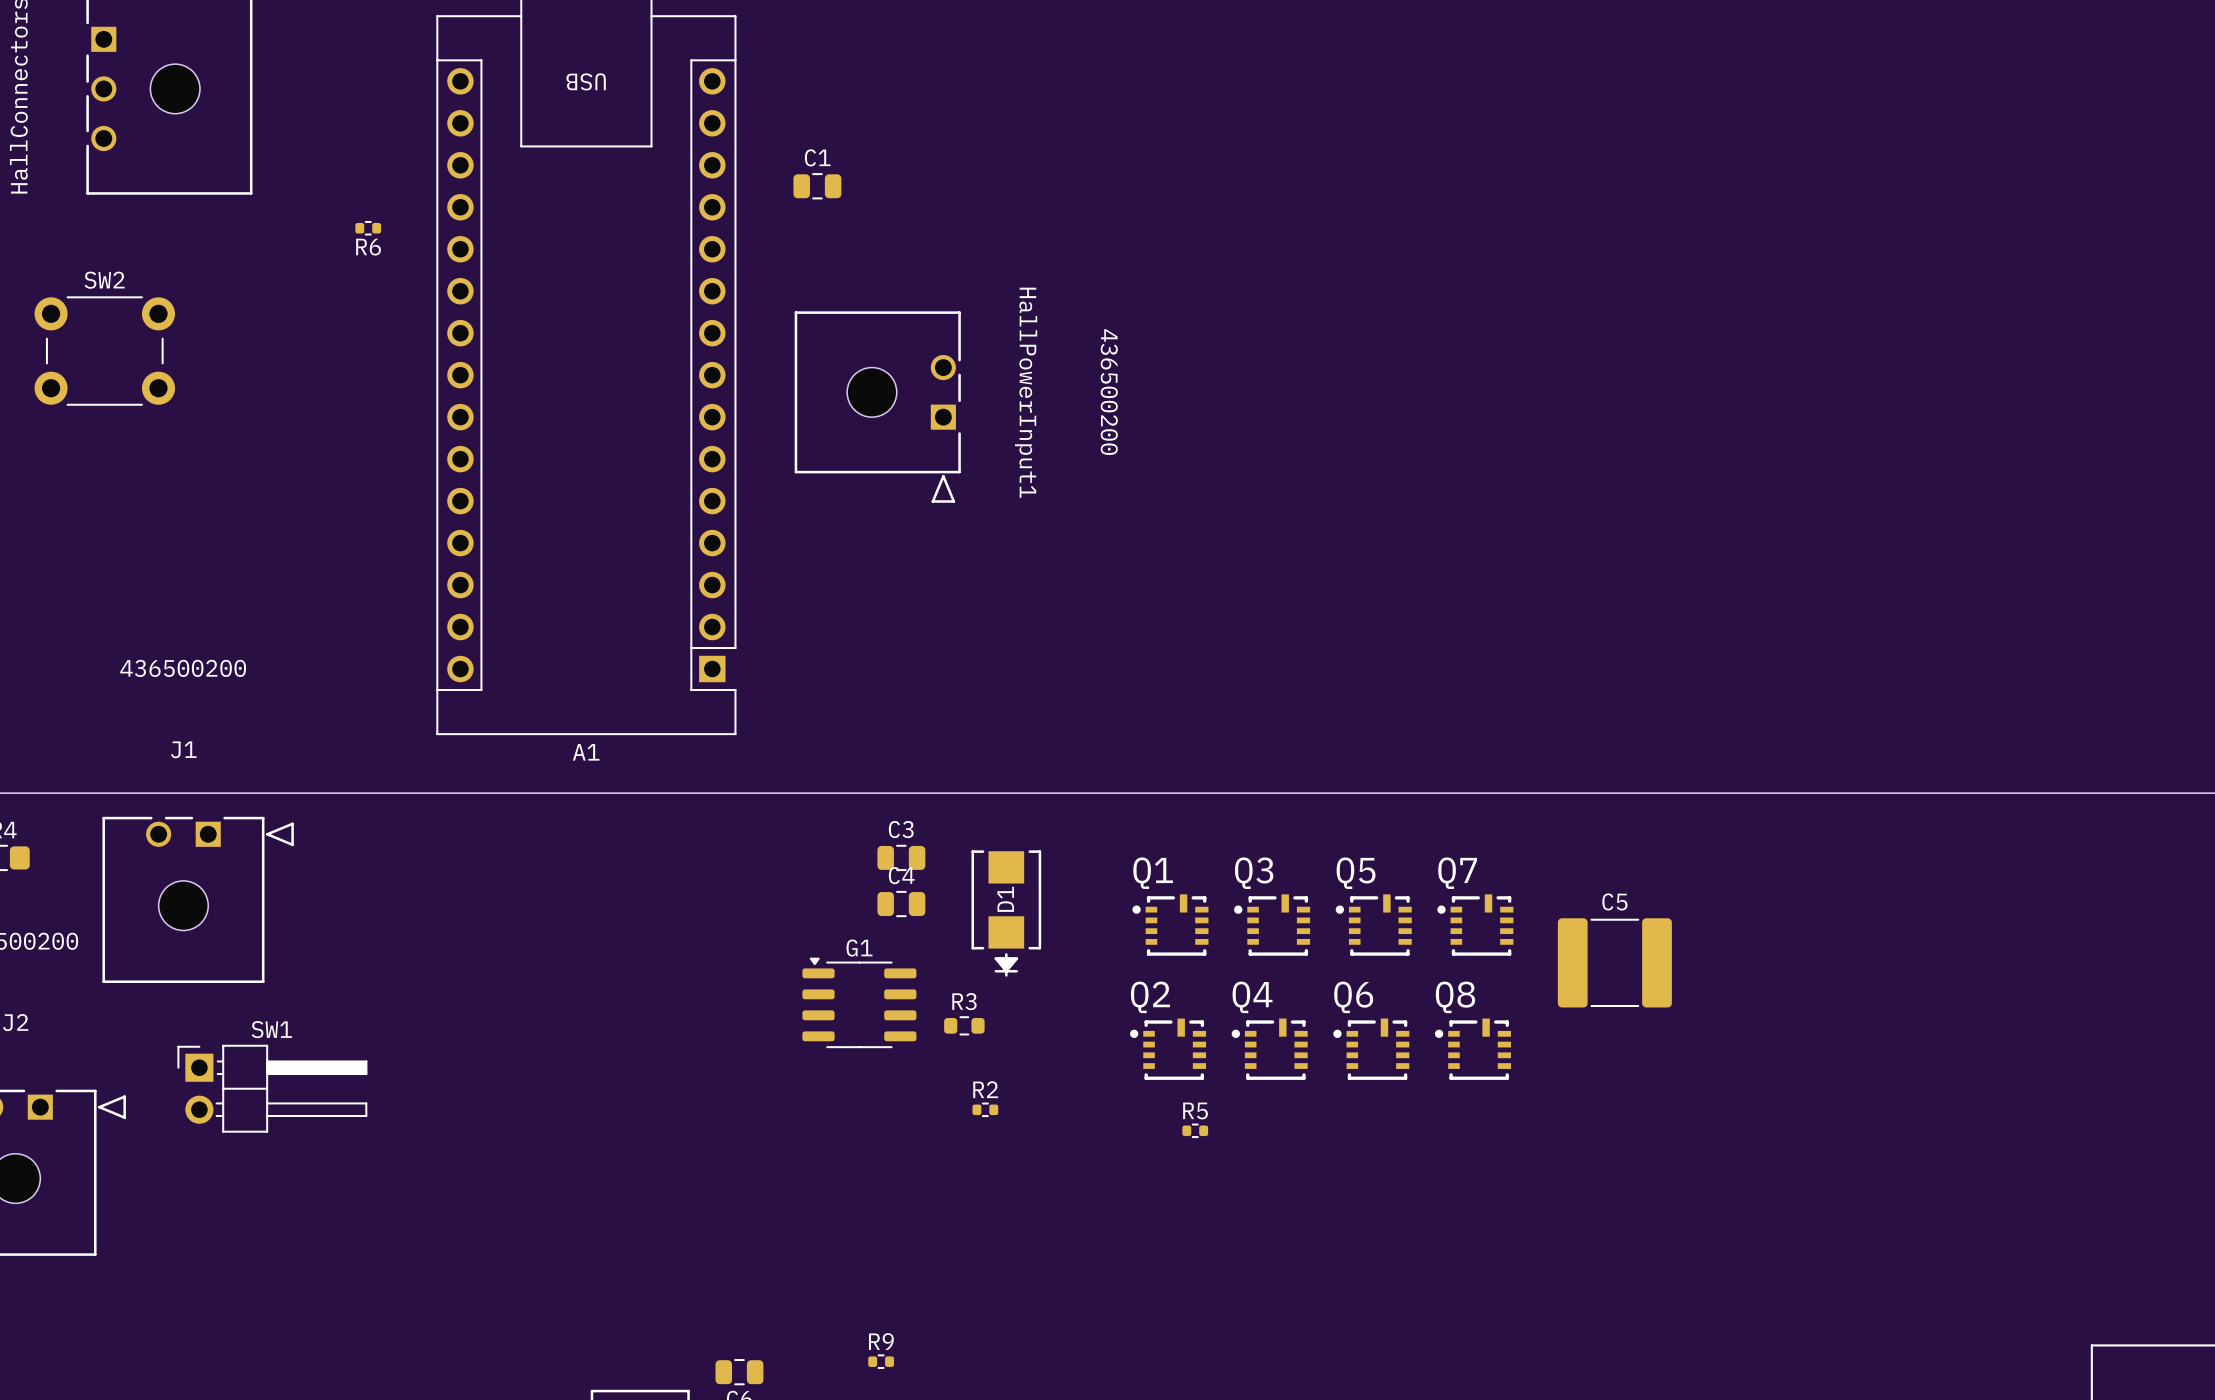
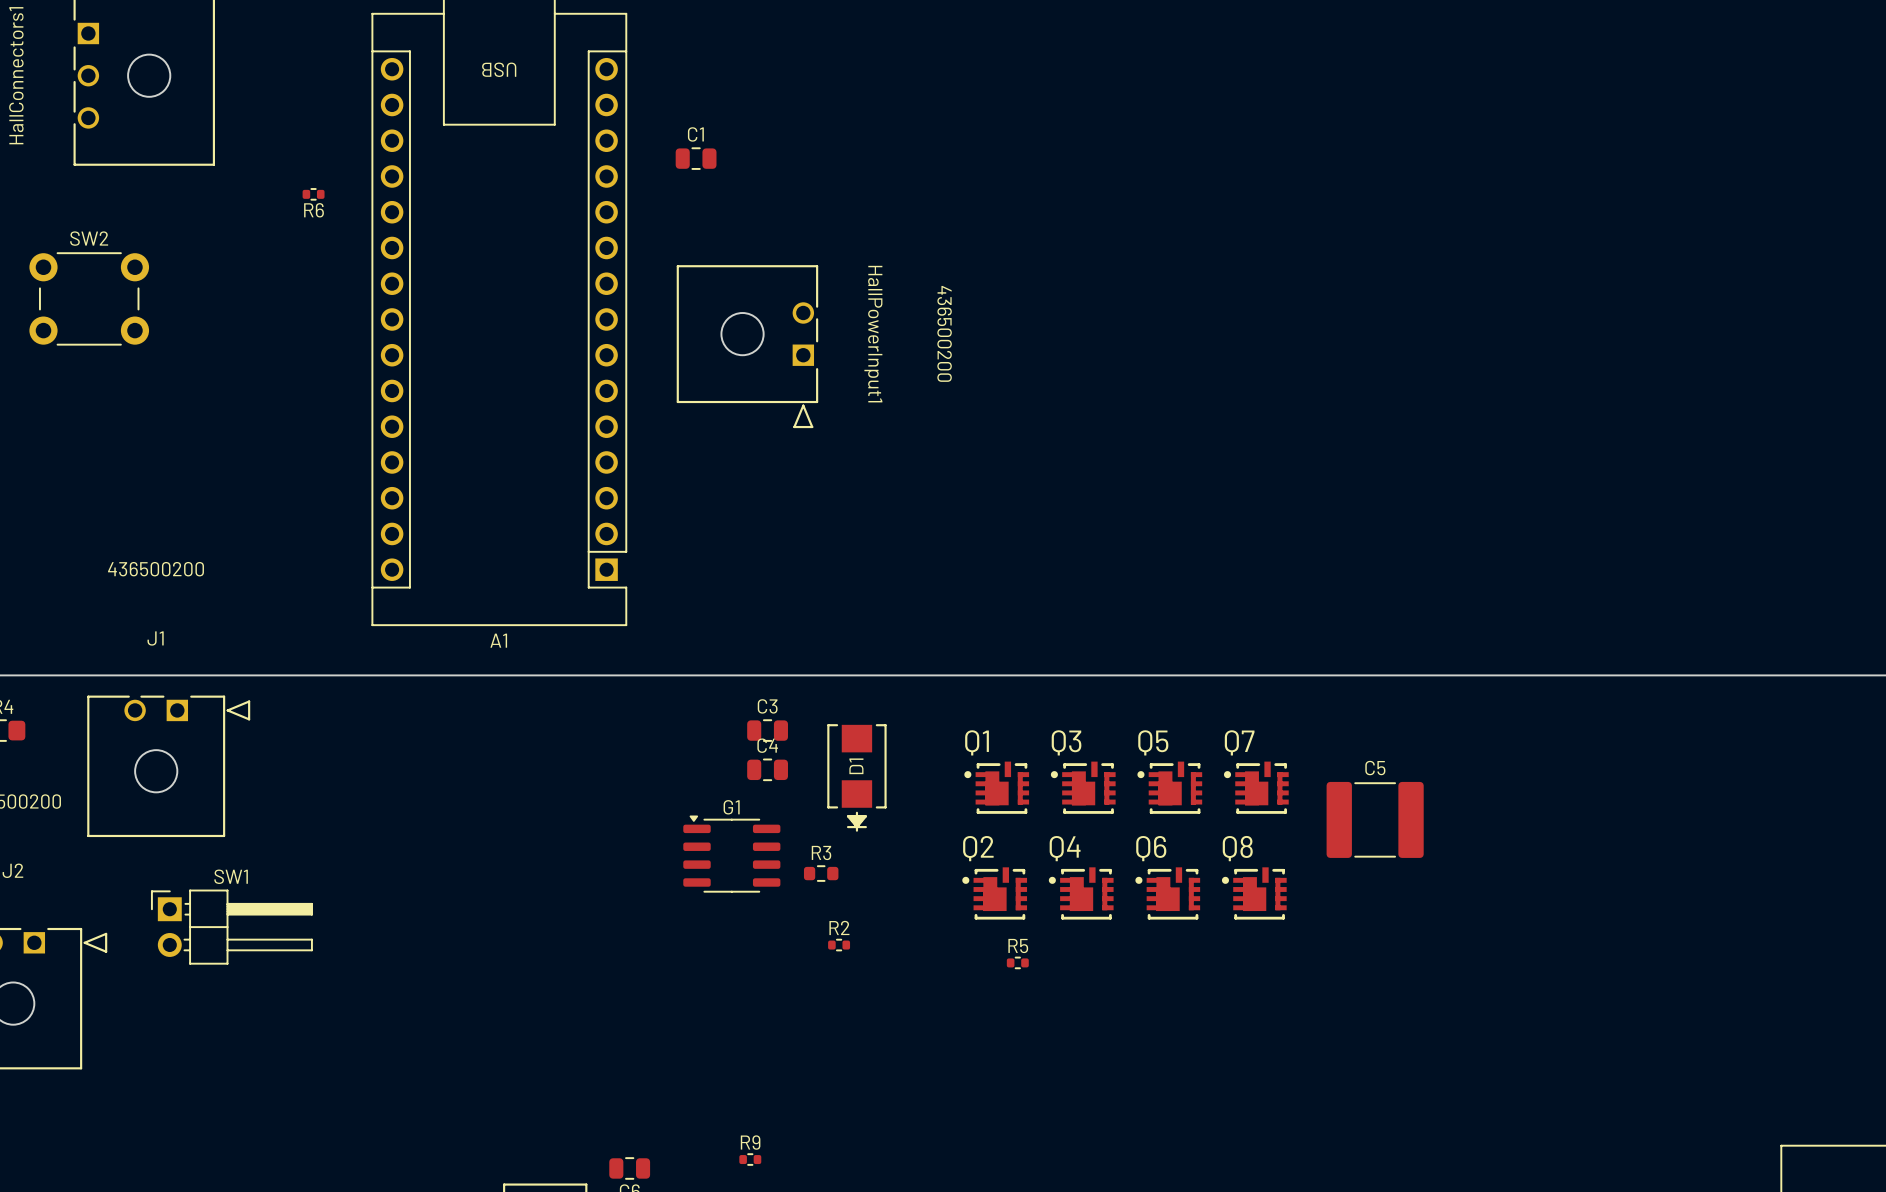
Q1 footprint: [1132, 894, 1209, 956] -> [964, 761, 1030, 814]
Q3 footprint: [1234, 894, 1311, 956] -> [1050, 761, 1116, 814]
Q5 footprint: [1335, 894, 1412, 956] -> [1137, 761, 1203, 814]
Q7 footprint: [1437, 894, 1514, 956] -> [1223, 761, 1289, 814]
Q2 footprint: [1130, 1018, 1207, 1080] -> [962, 867, 1028, 920]
Q4 footprint: [1231, 1018, 1308, 1080] -> [1048, 867, 1114, 920]
Q6 footprint: [1333, 1018, 1410, 1080] -> [1135, 867, 1201, 920]
Q8 footprint: [1434, 1018, 1511, 1080] -> [1221, 867, 1287, 920]

